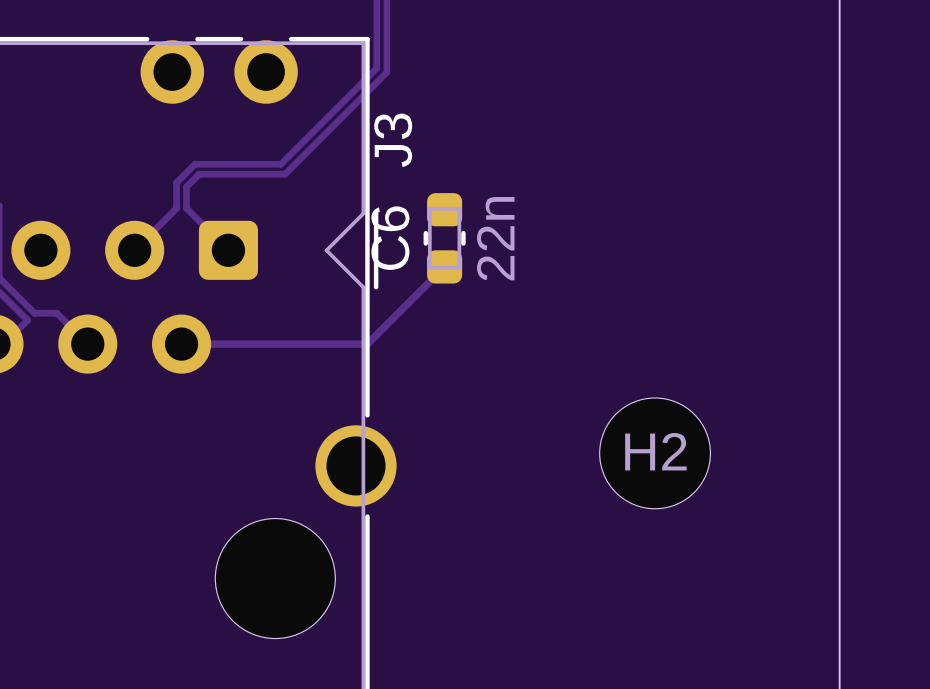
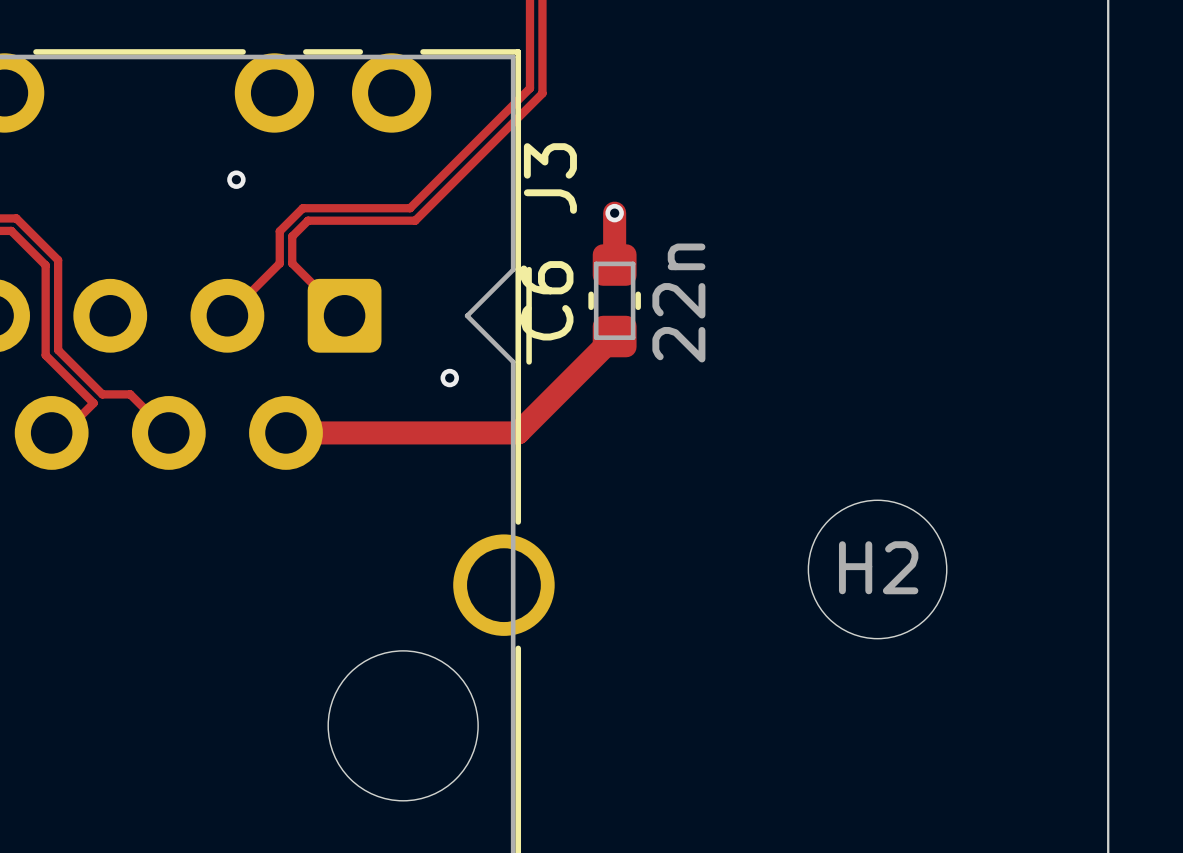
via: none -> (236, 179)
track: none -> (614, 213) (614, 265)
via: none -> (614, 213)
track width: thin (444, 266) (367, 344) (181, 344) -> thick (614, 336) (518, 432) (285, 432)
via: none -> (449, 378)

